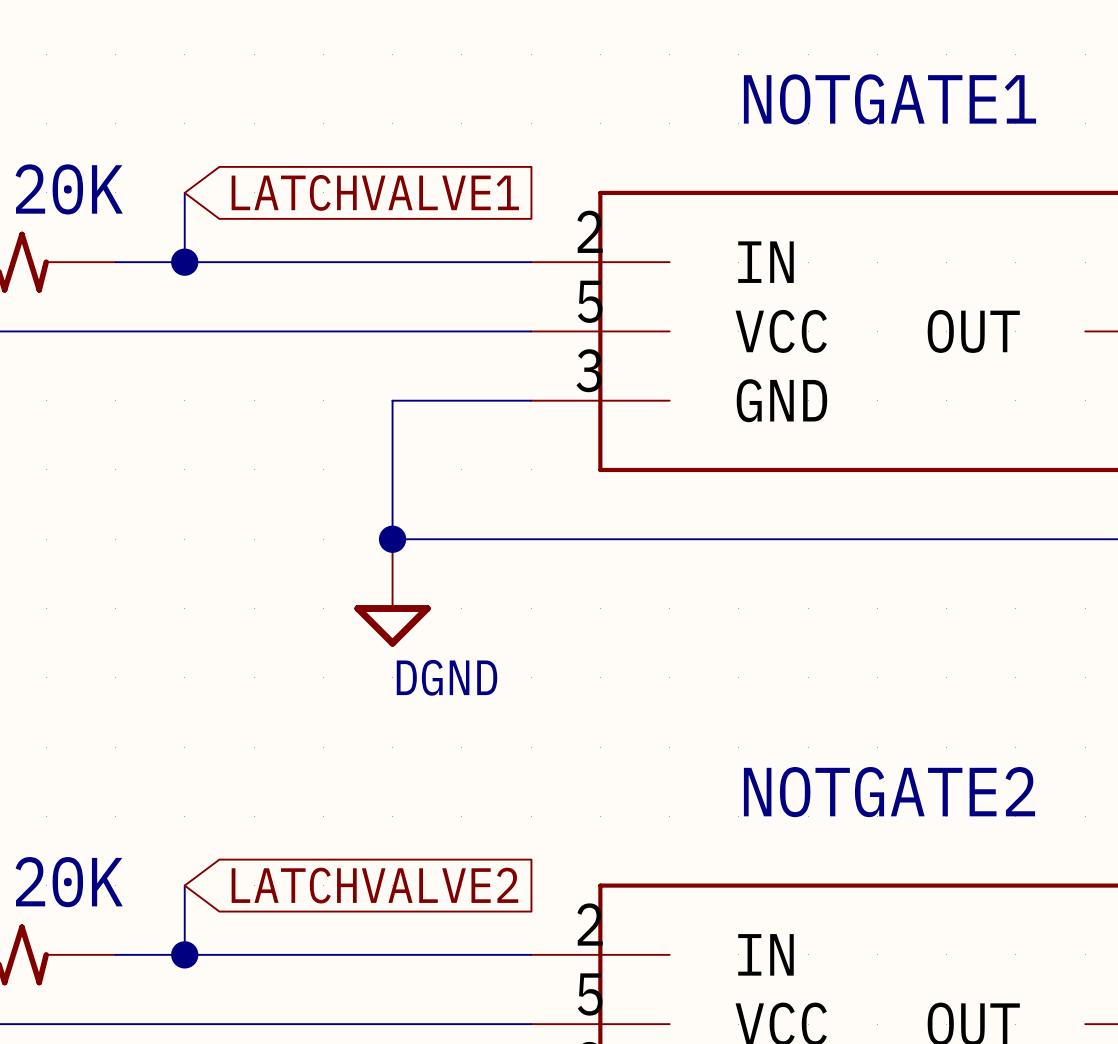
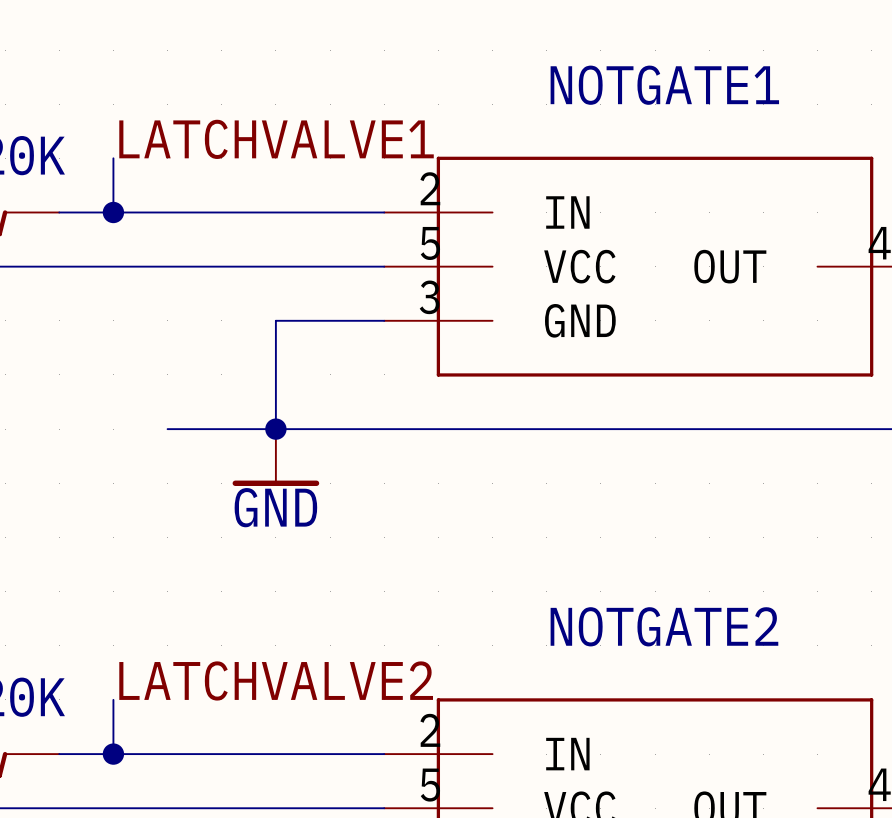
label: none -> LATCHVALVE1 (276, 139)
global label: LATCHVALVE1 (375, 192) -> none
wire: none -> (167, 429) (275, 429)
power symbol: DGND (392, 592) -> GND (275, 457)
label: none -> LATCHVALVE2 (276, 680)
global label: LATCHVALVE2 (374, 885) -> none

